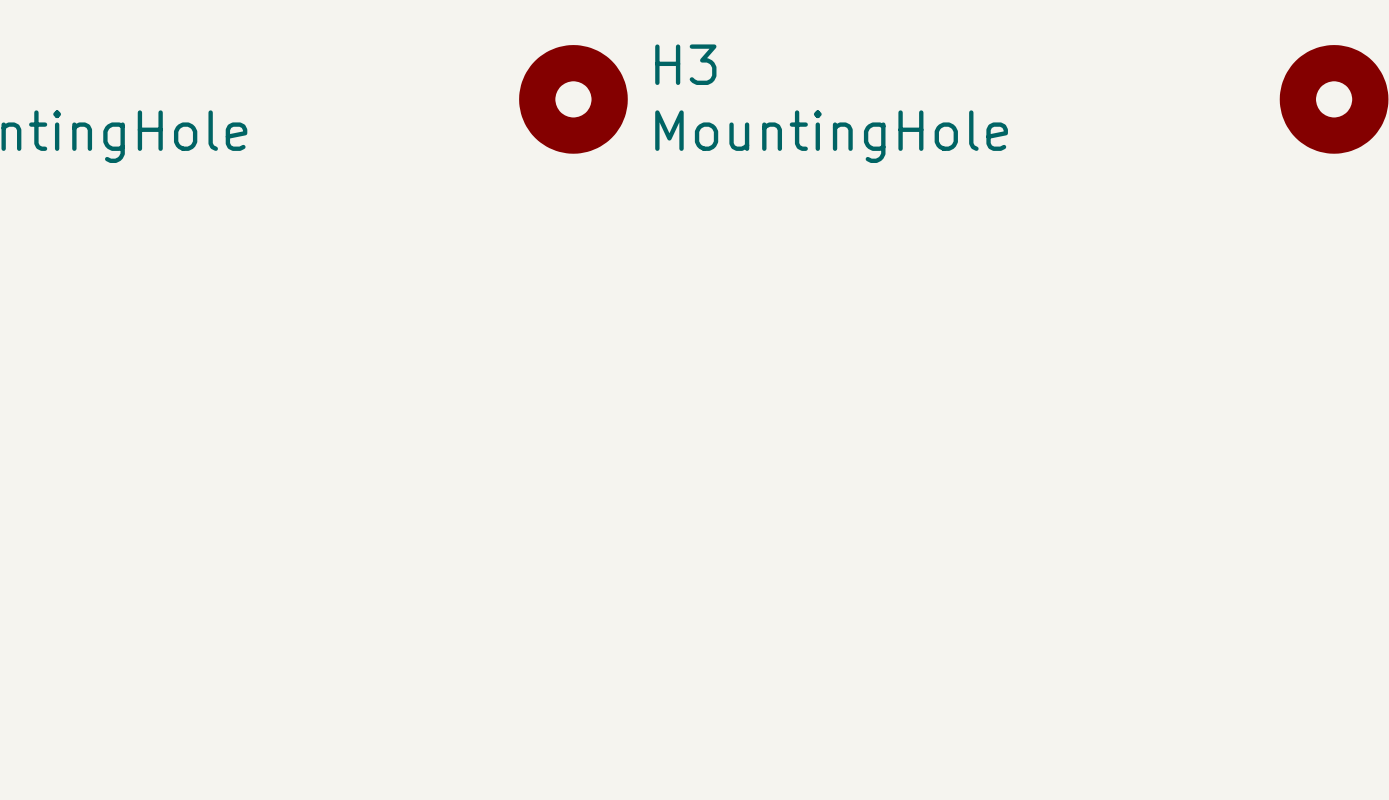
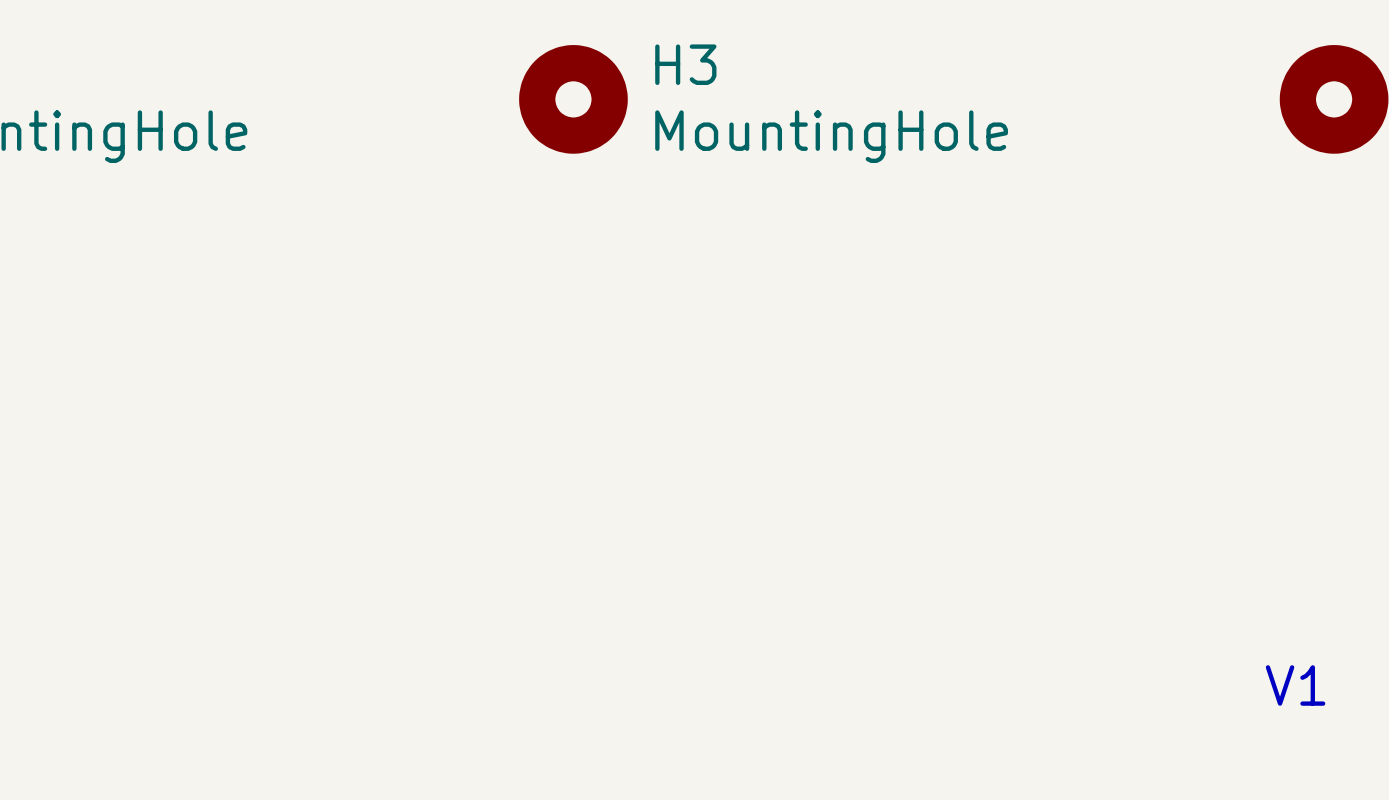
text: none -> V1 (1295, 685)

